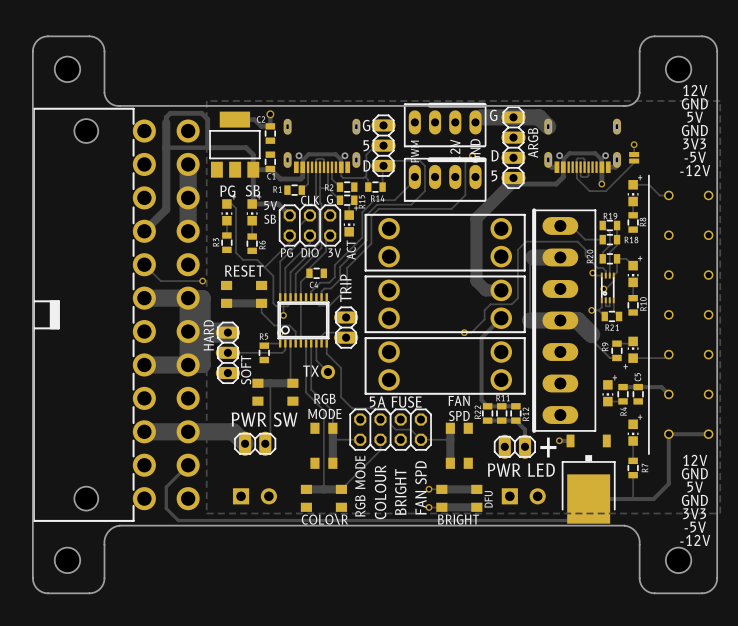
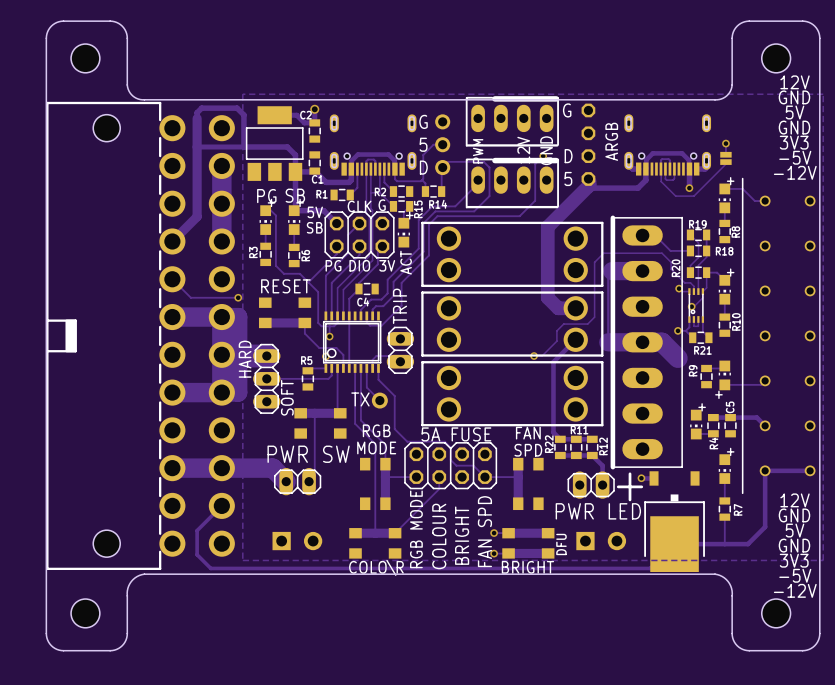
part footprint: [501, 106, 526, 189] -> [581, 103, 596, 186]
part footprint: [371, 114, 396, 177] -> [435, 114, 451, 176]
track: (475, 122) (480, 117) (538, 117) (548, 126) -> none
track: (591, 334) (591, 339) (609, 357) (616, 357) -> none

